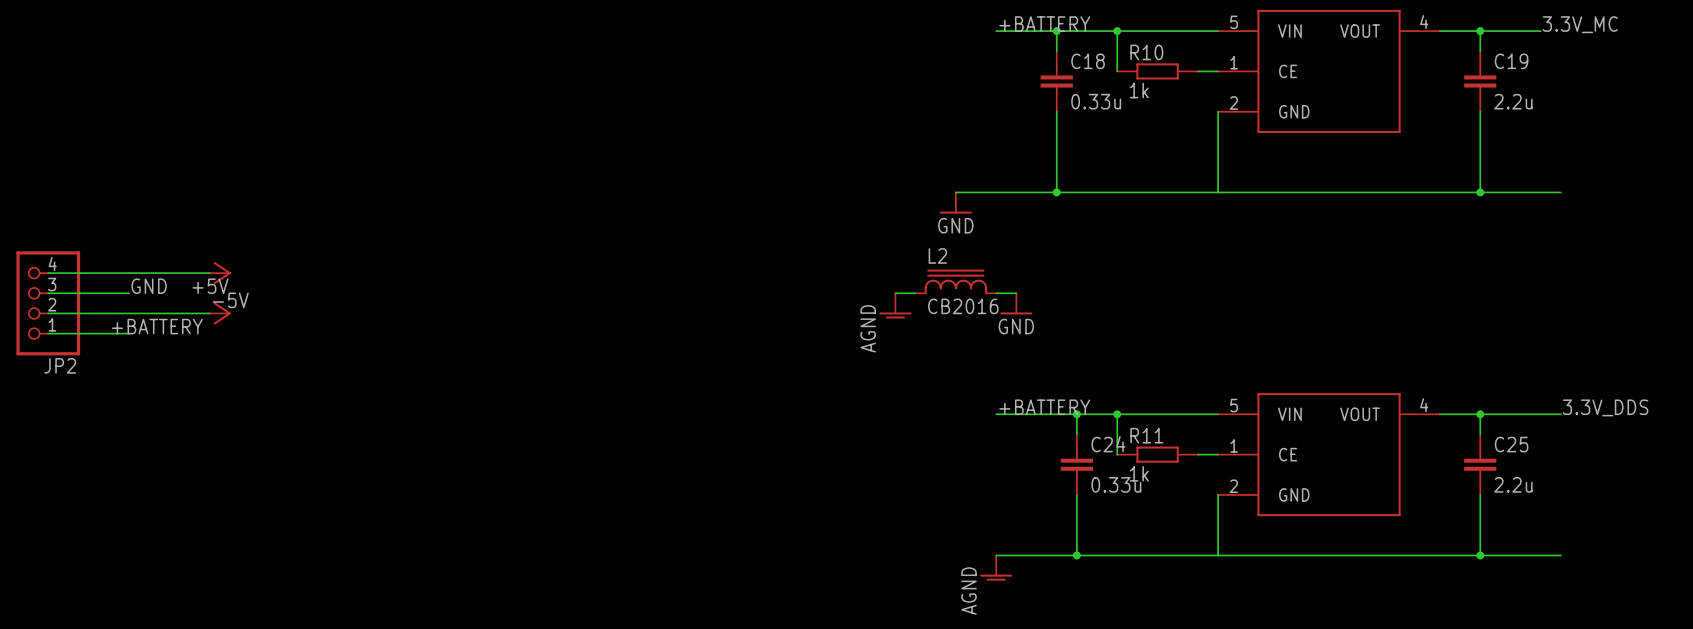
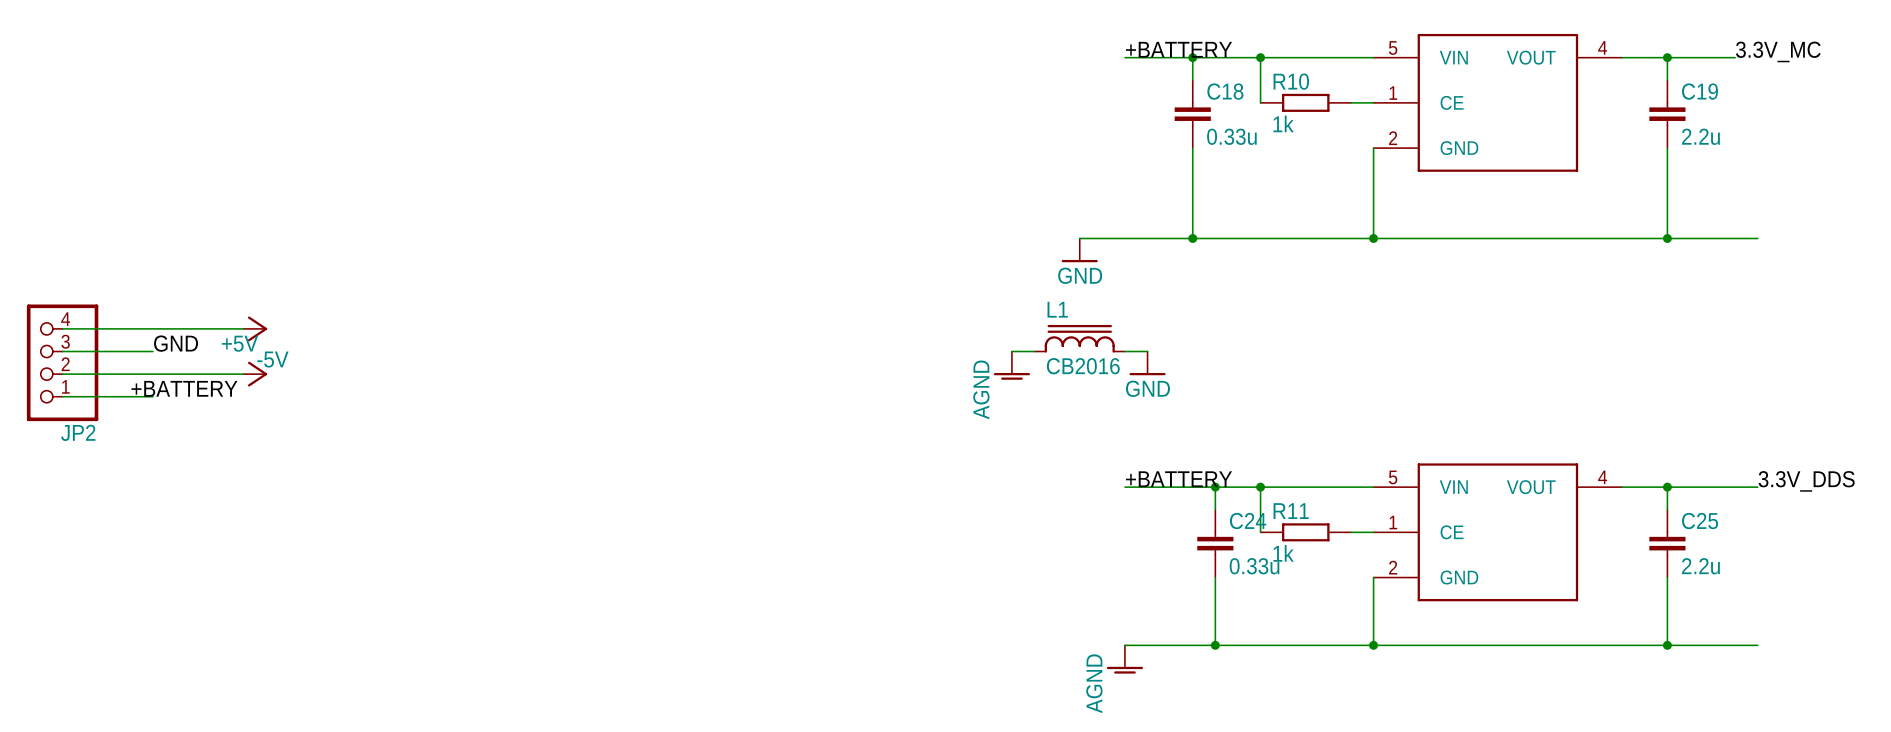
junction: none -> (1373, 238)
L2 name: L2 (937, 255) -> L1 (1057, 309)
junction: none -> (1373, 645)

